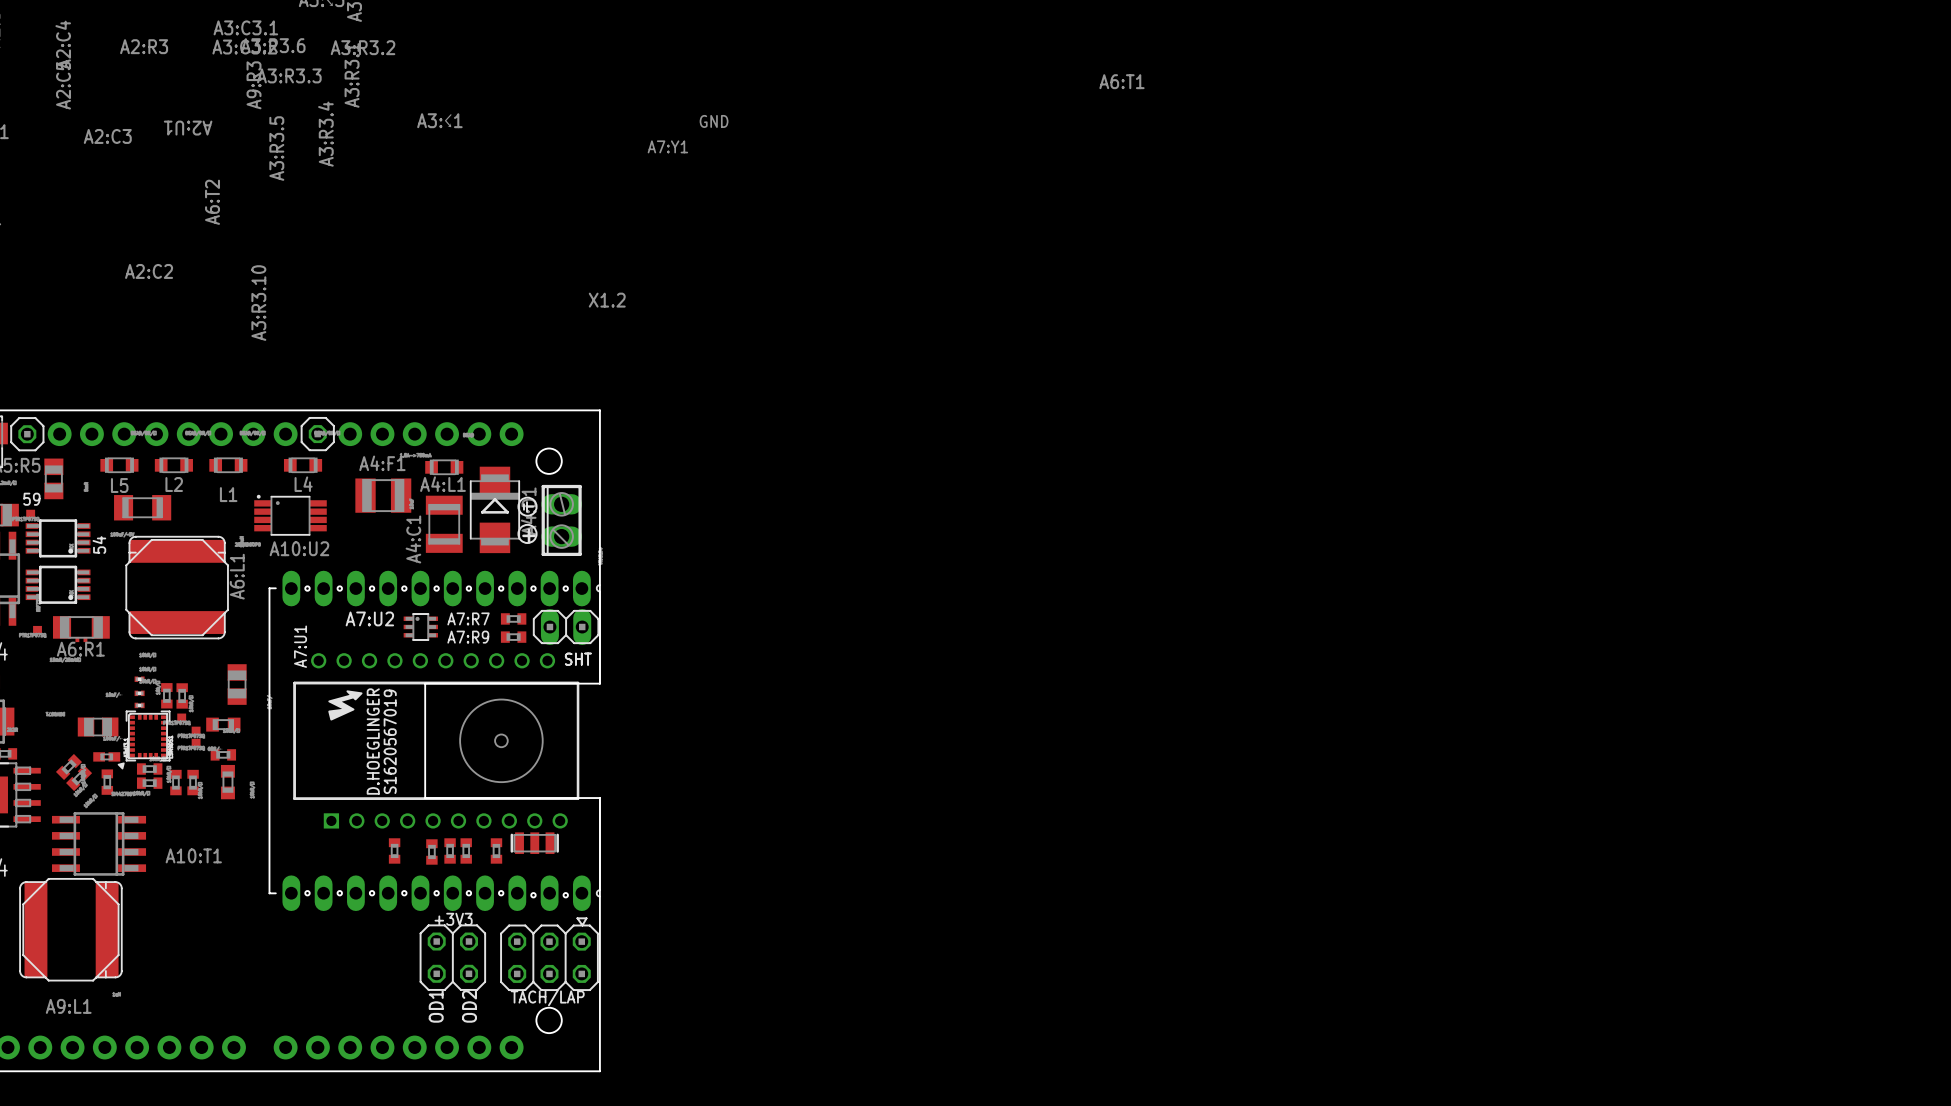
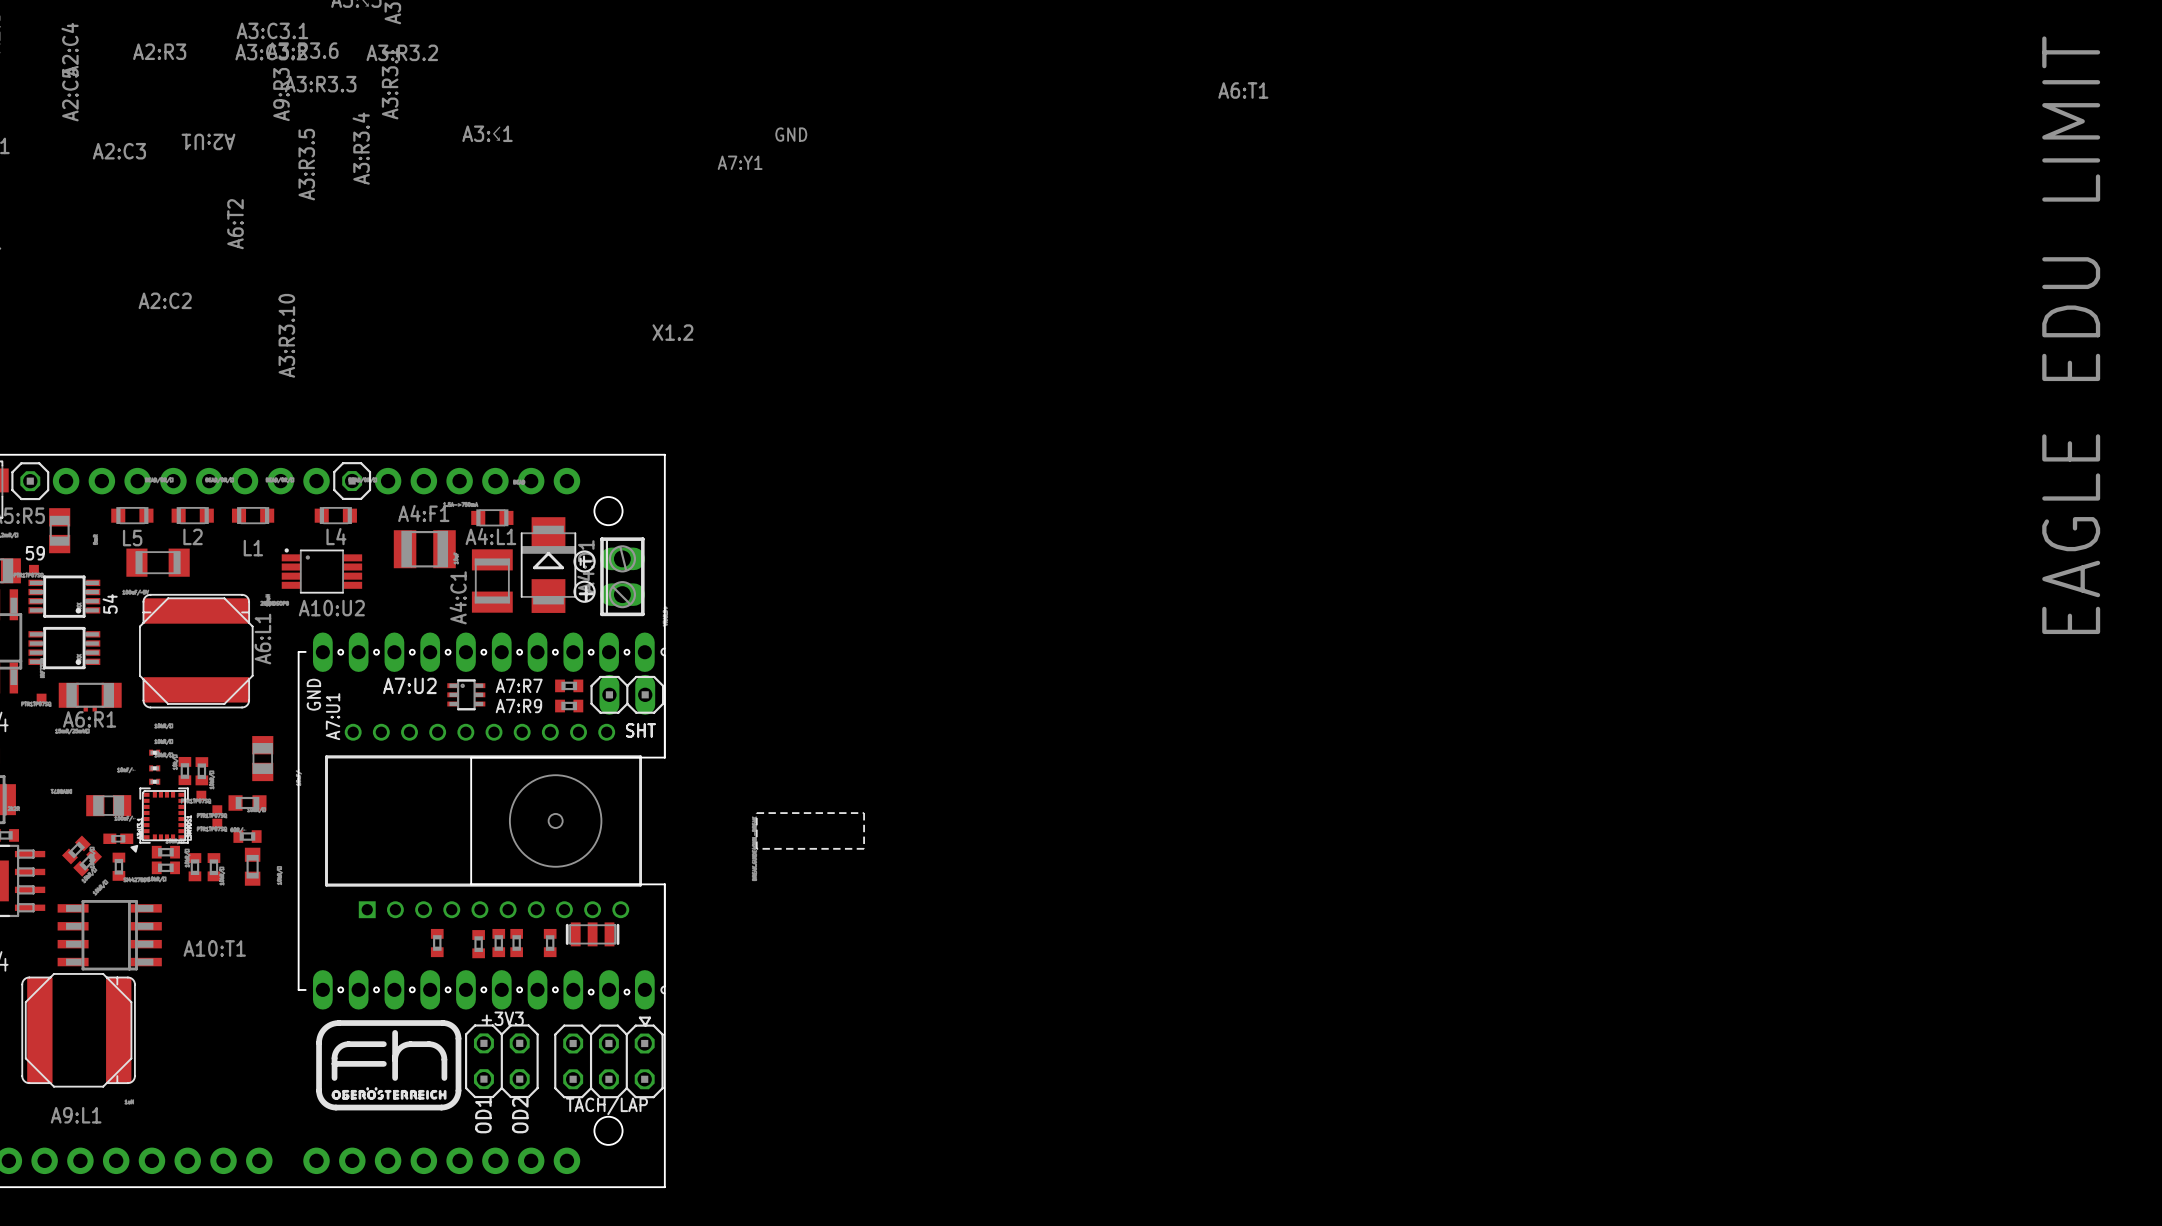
drawing: none -> [2042, 36, 2101, 635]
text: none -> GND (313, 694)
drawing: [328, 690, 363, 721] -> none
drawing: none -> [756, 813, 865, 849]
text: D.HOEGLINGER (373, 741) -> none
text: S1620567019 (390, 741) -> none
drawing: none -> [316, 1020, 462, 1111]

